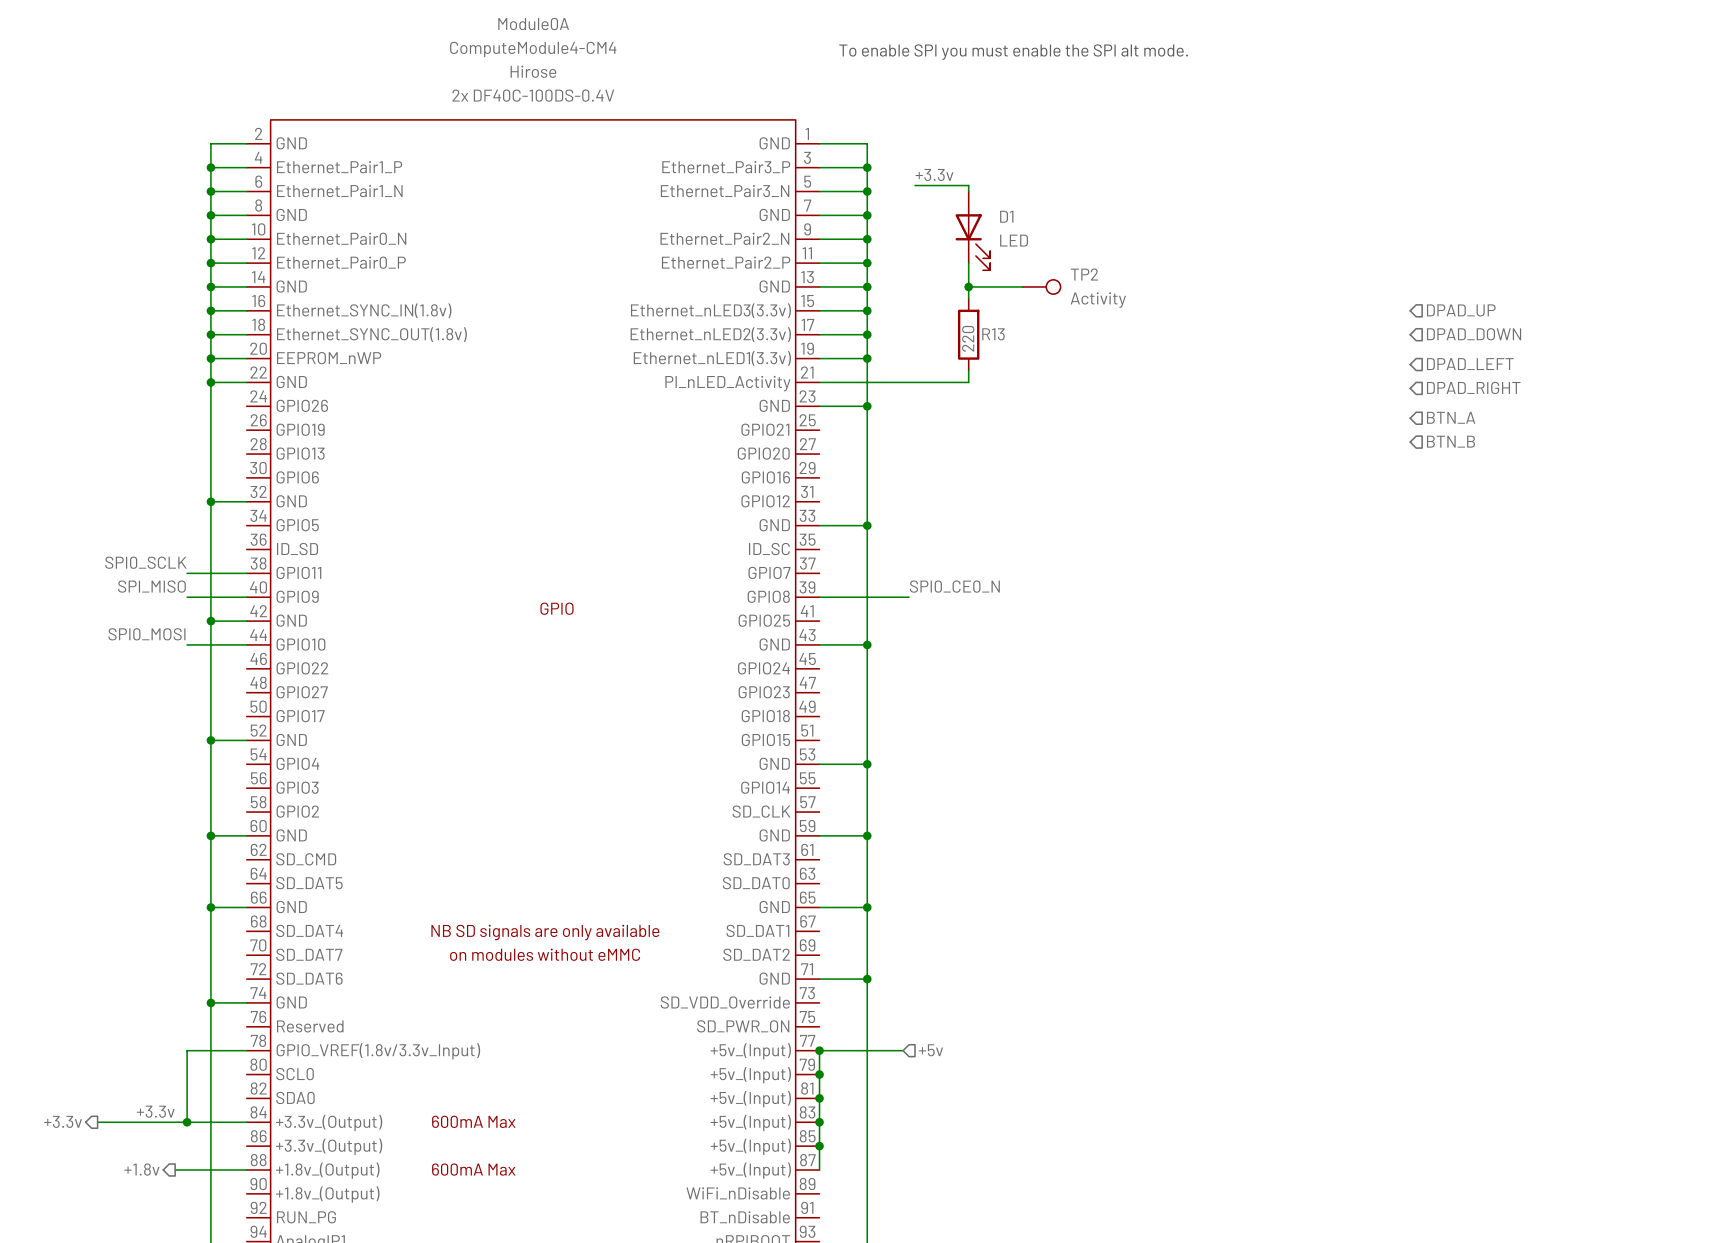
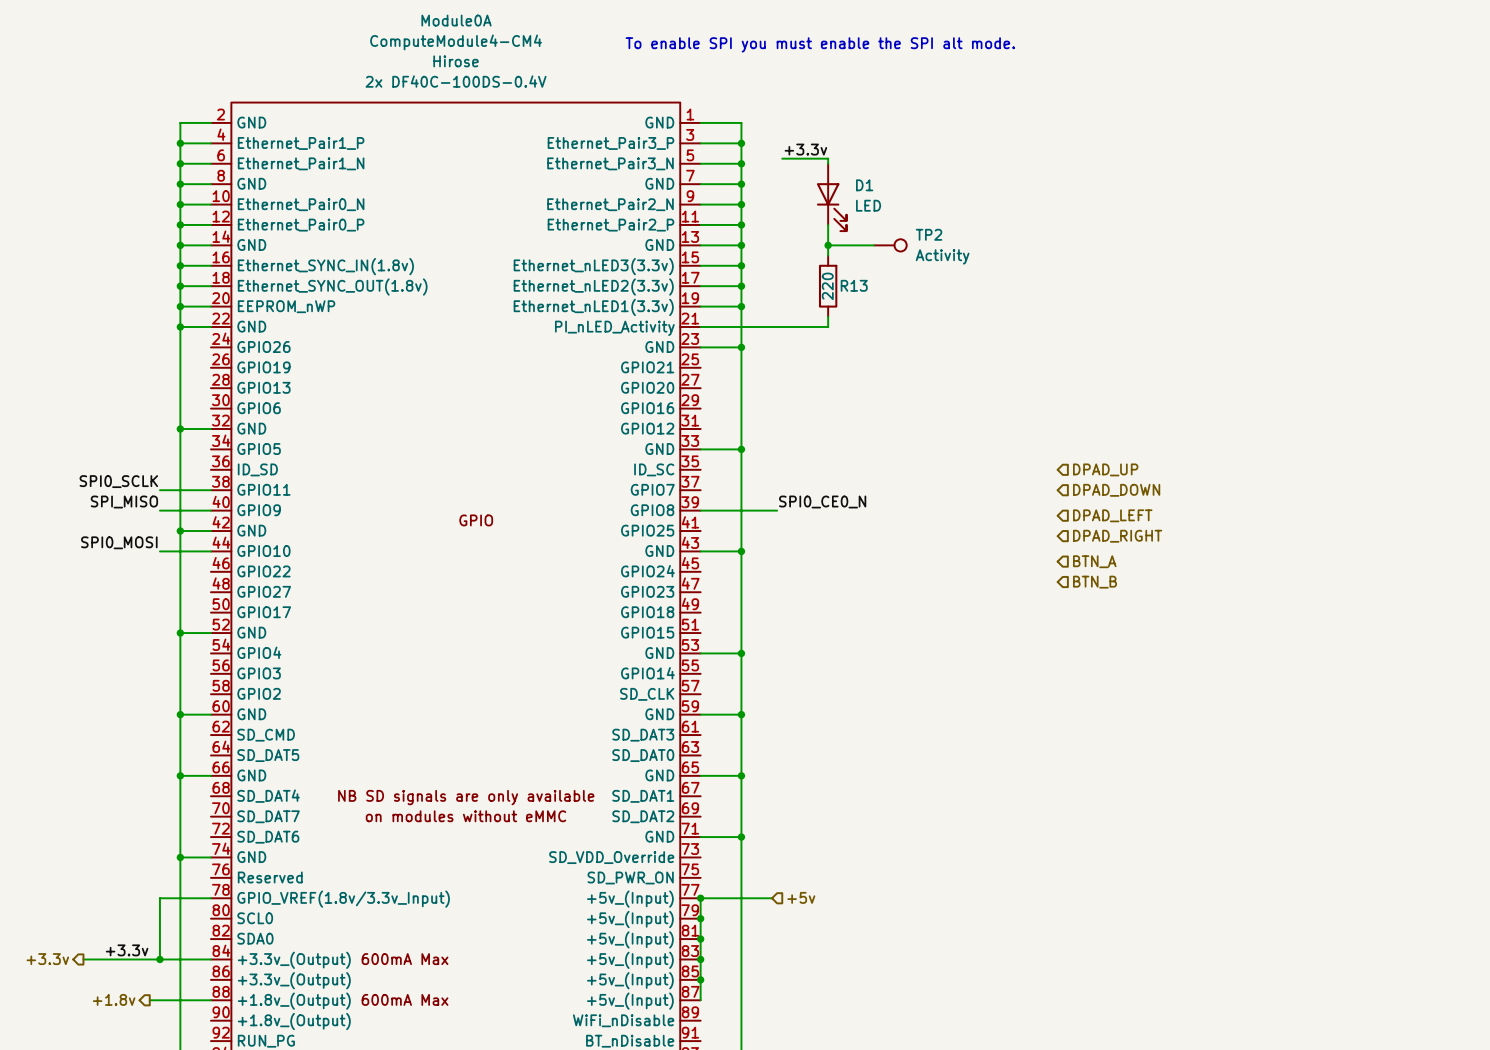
hierarchical label: DPAD_UP (1461, 310) -> none
hierarchical label: DPAD_DOWN (1474, 334) -> none
hierarchical label: DPAD_LEFT (1470, 364) -> none
hierarchical label: DPAD_RIGHT (1473, 387) -> none
hierarchical label: BTN_A (1451, 417) -> none
hierarchical label: BTN_B (1450, 441) -> none
hierarchical label: none -> DPAD_UP (1105, 469)
hierarchical label: none -> DPAD_DOWN (1116, 490)
hierarchical label: none -> DPAD_LEFT (1112, 515)
hierarchical label: none -> DPAD_RIGHT (1117, 536)
hierarchical label: none -> BTN_A (1094, 561)
hierarchical label: none -> BTN_B (1095, 582)

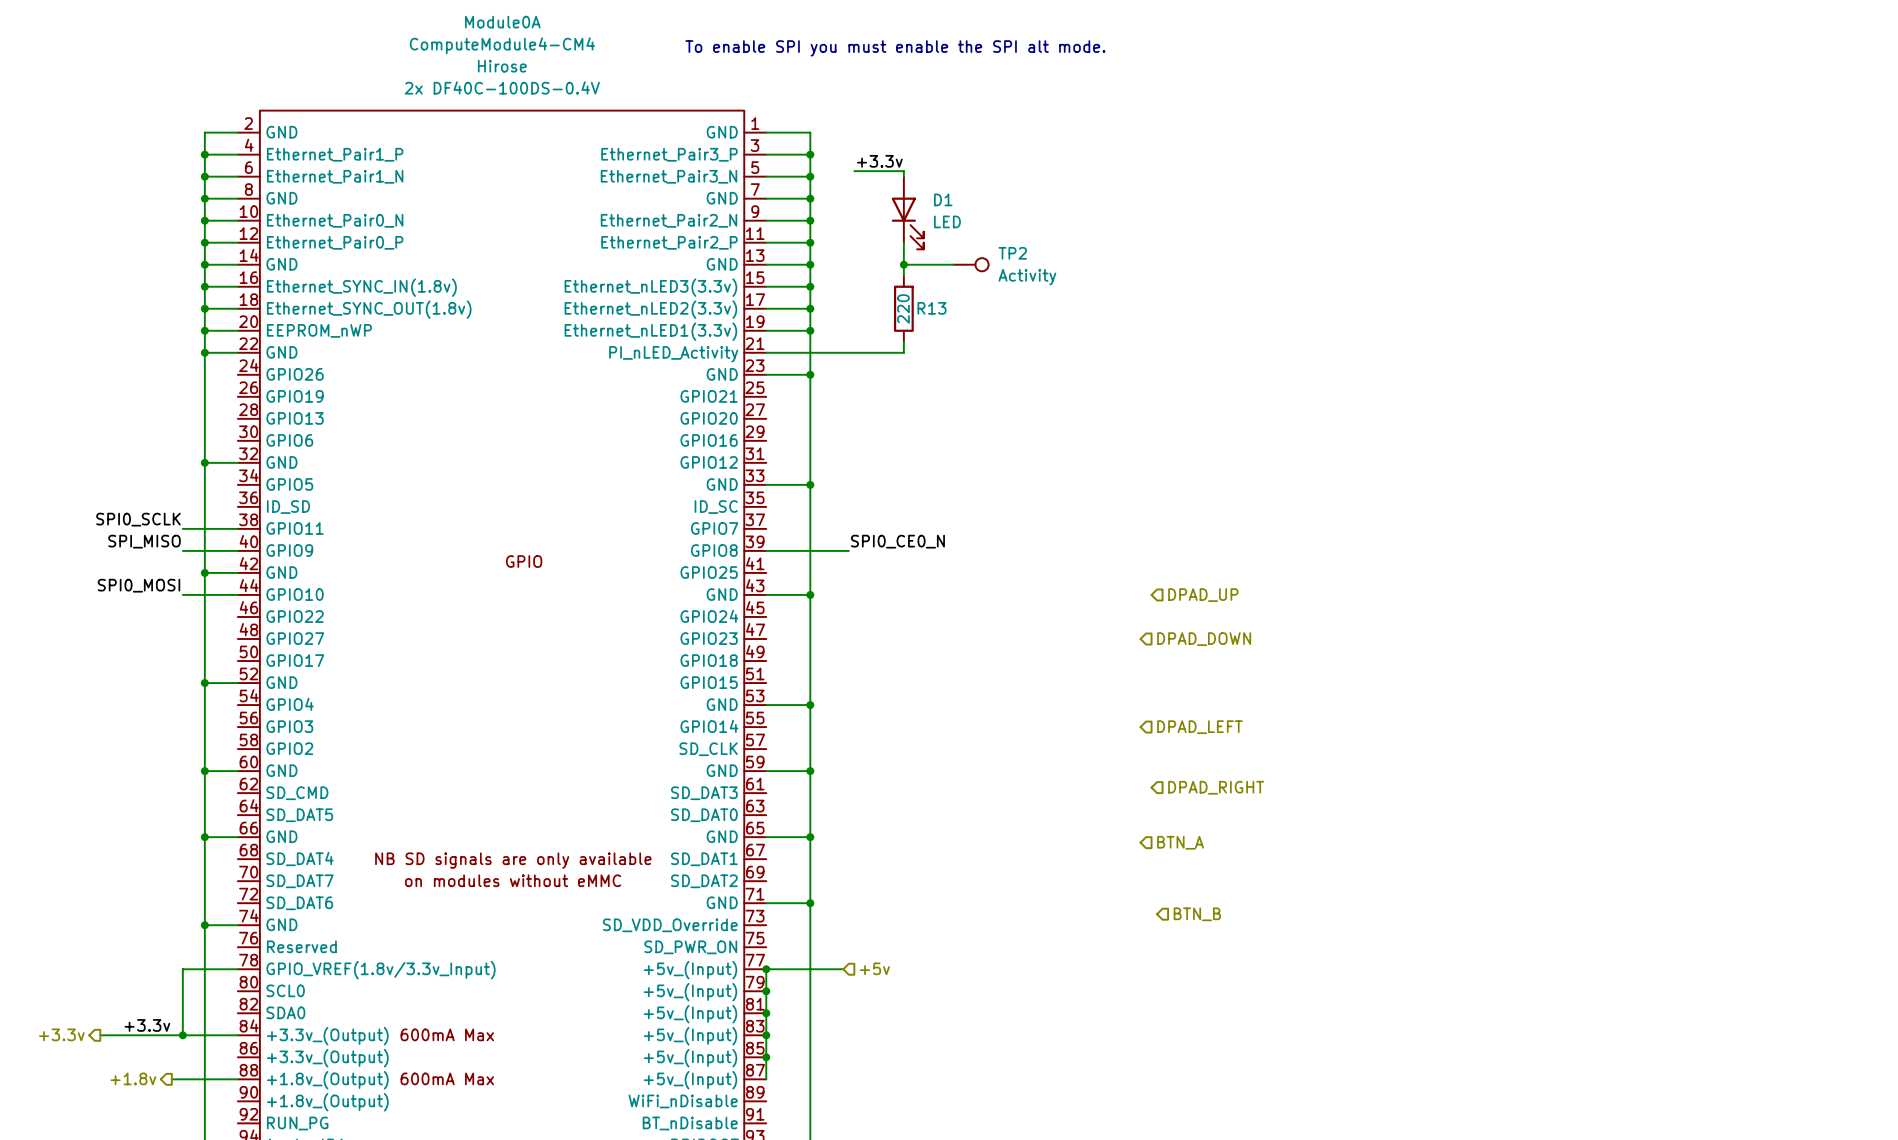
hierarchical label position: DPAD_UP (1105, 469) -> DPAD_UP (1203, 595)
hierarchical label position: DPAD_DOWN (1116, 490) -> DPAD_DOWN (1204, 639)
hierarchical label position: DPAD_LEFT (1112, 515) -> DPAD_LEFT (1199, 727)
hierarchical label position: DPAD_RIGHT (1117, 536) -> DPAD_RIGHT (1216, 787)
hierarchical label: BTN_A (1094, 561) -> none
hierarchical label: BTN_B (1095, 582) -> none
hierarchical label: none -> BTN_A (1180, 842)
hierarchical label: none -> BTN_B (1197, 914)

